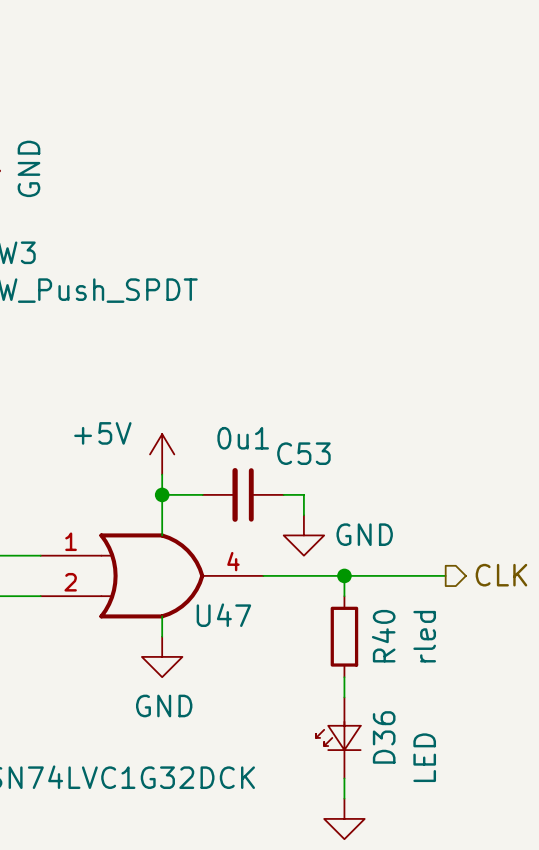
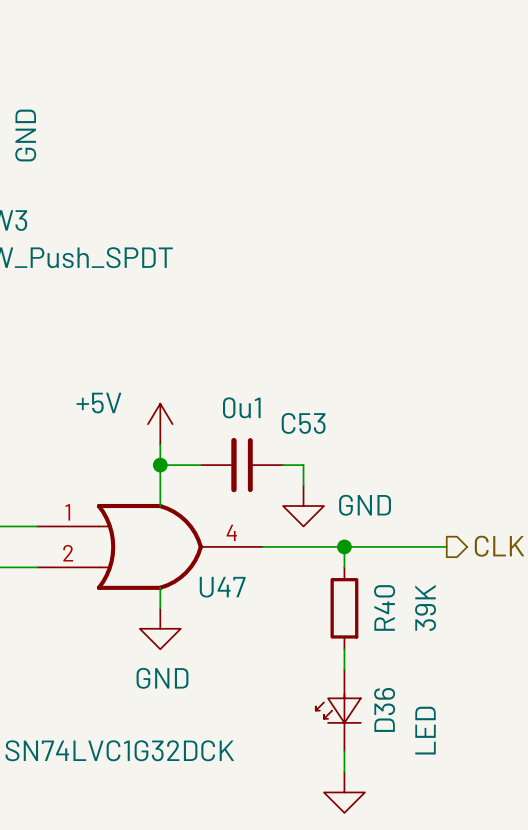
R40 value: rled (424, 636) -> 39K (425, 607)

